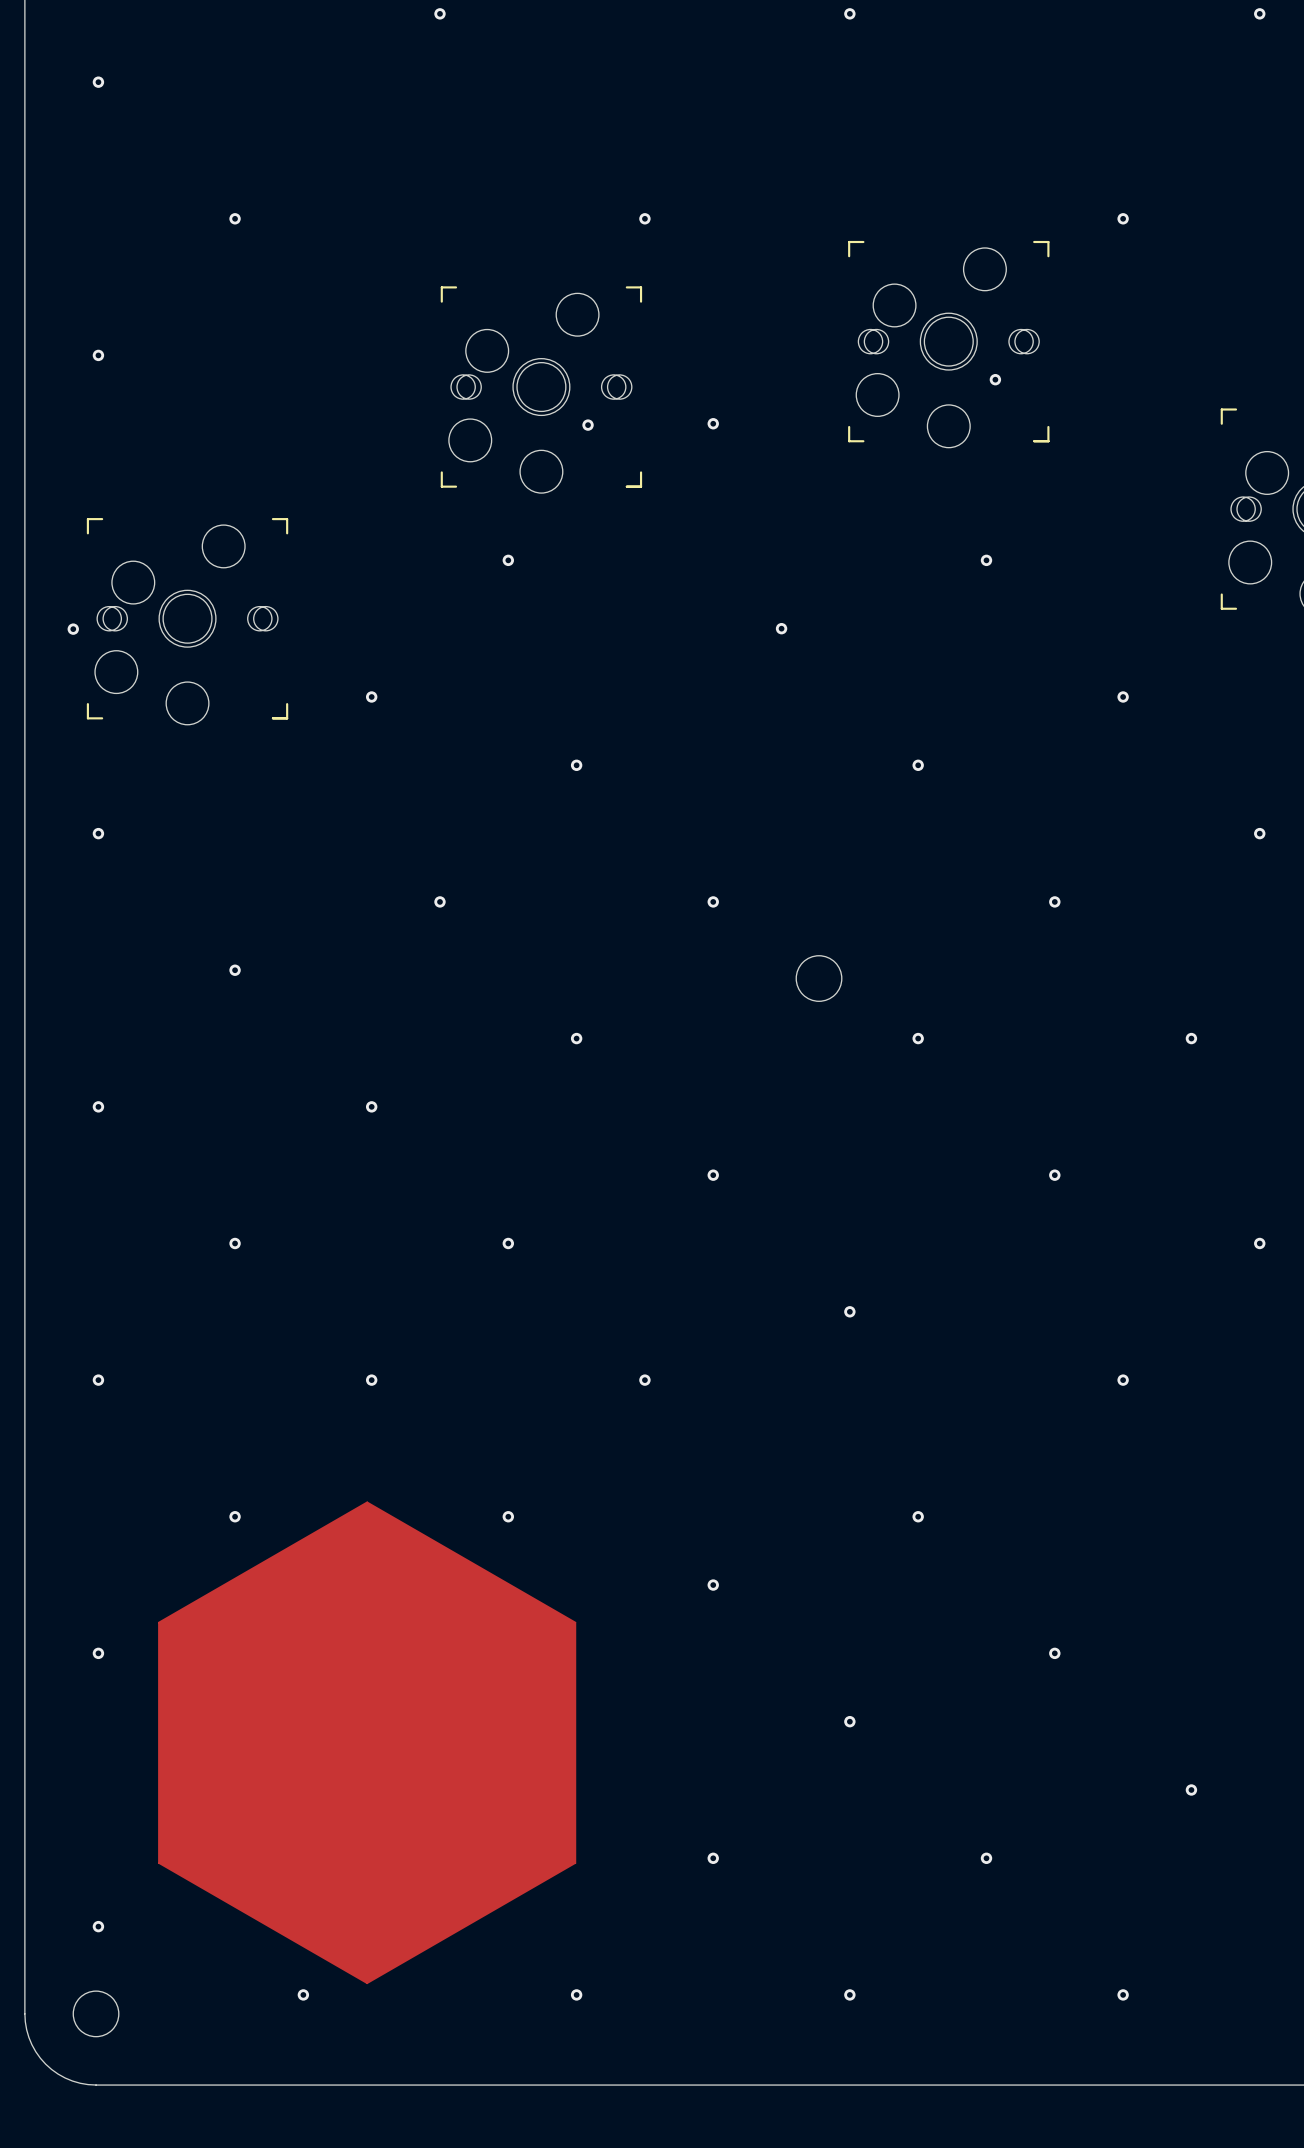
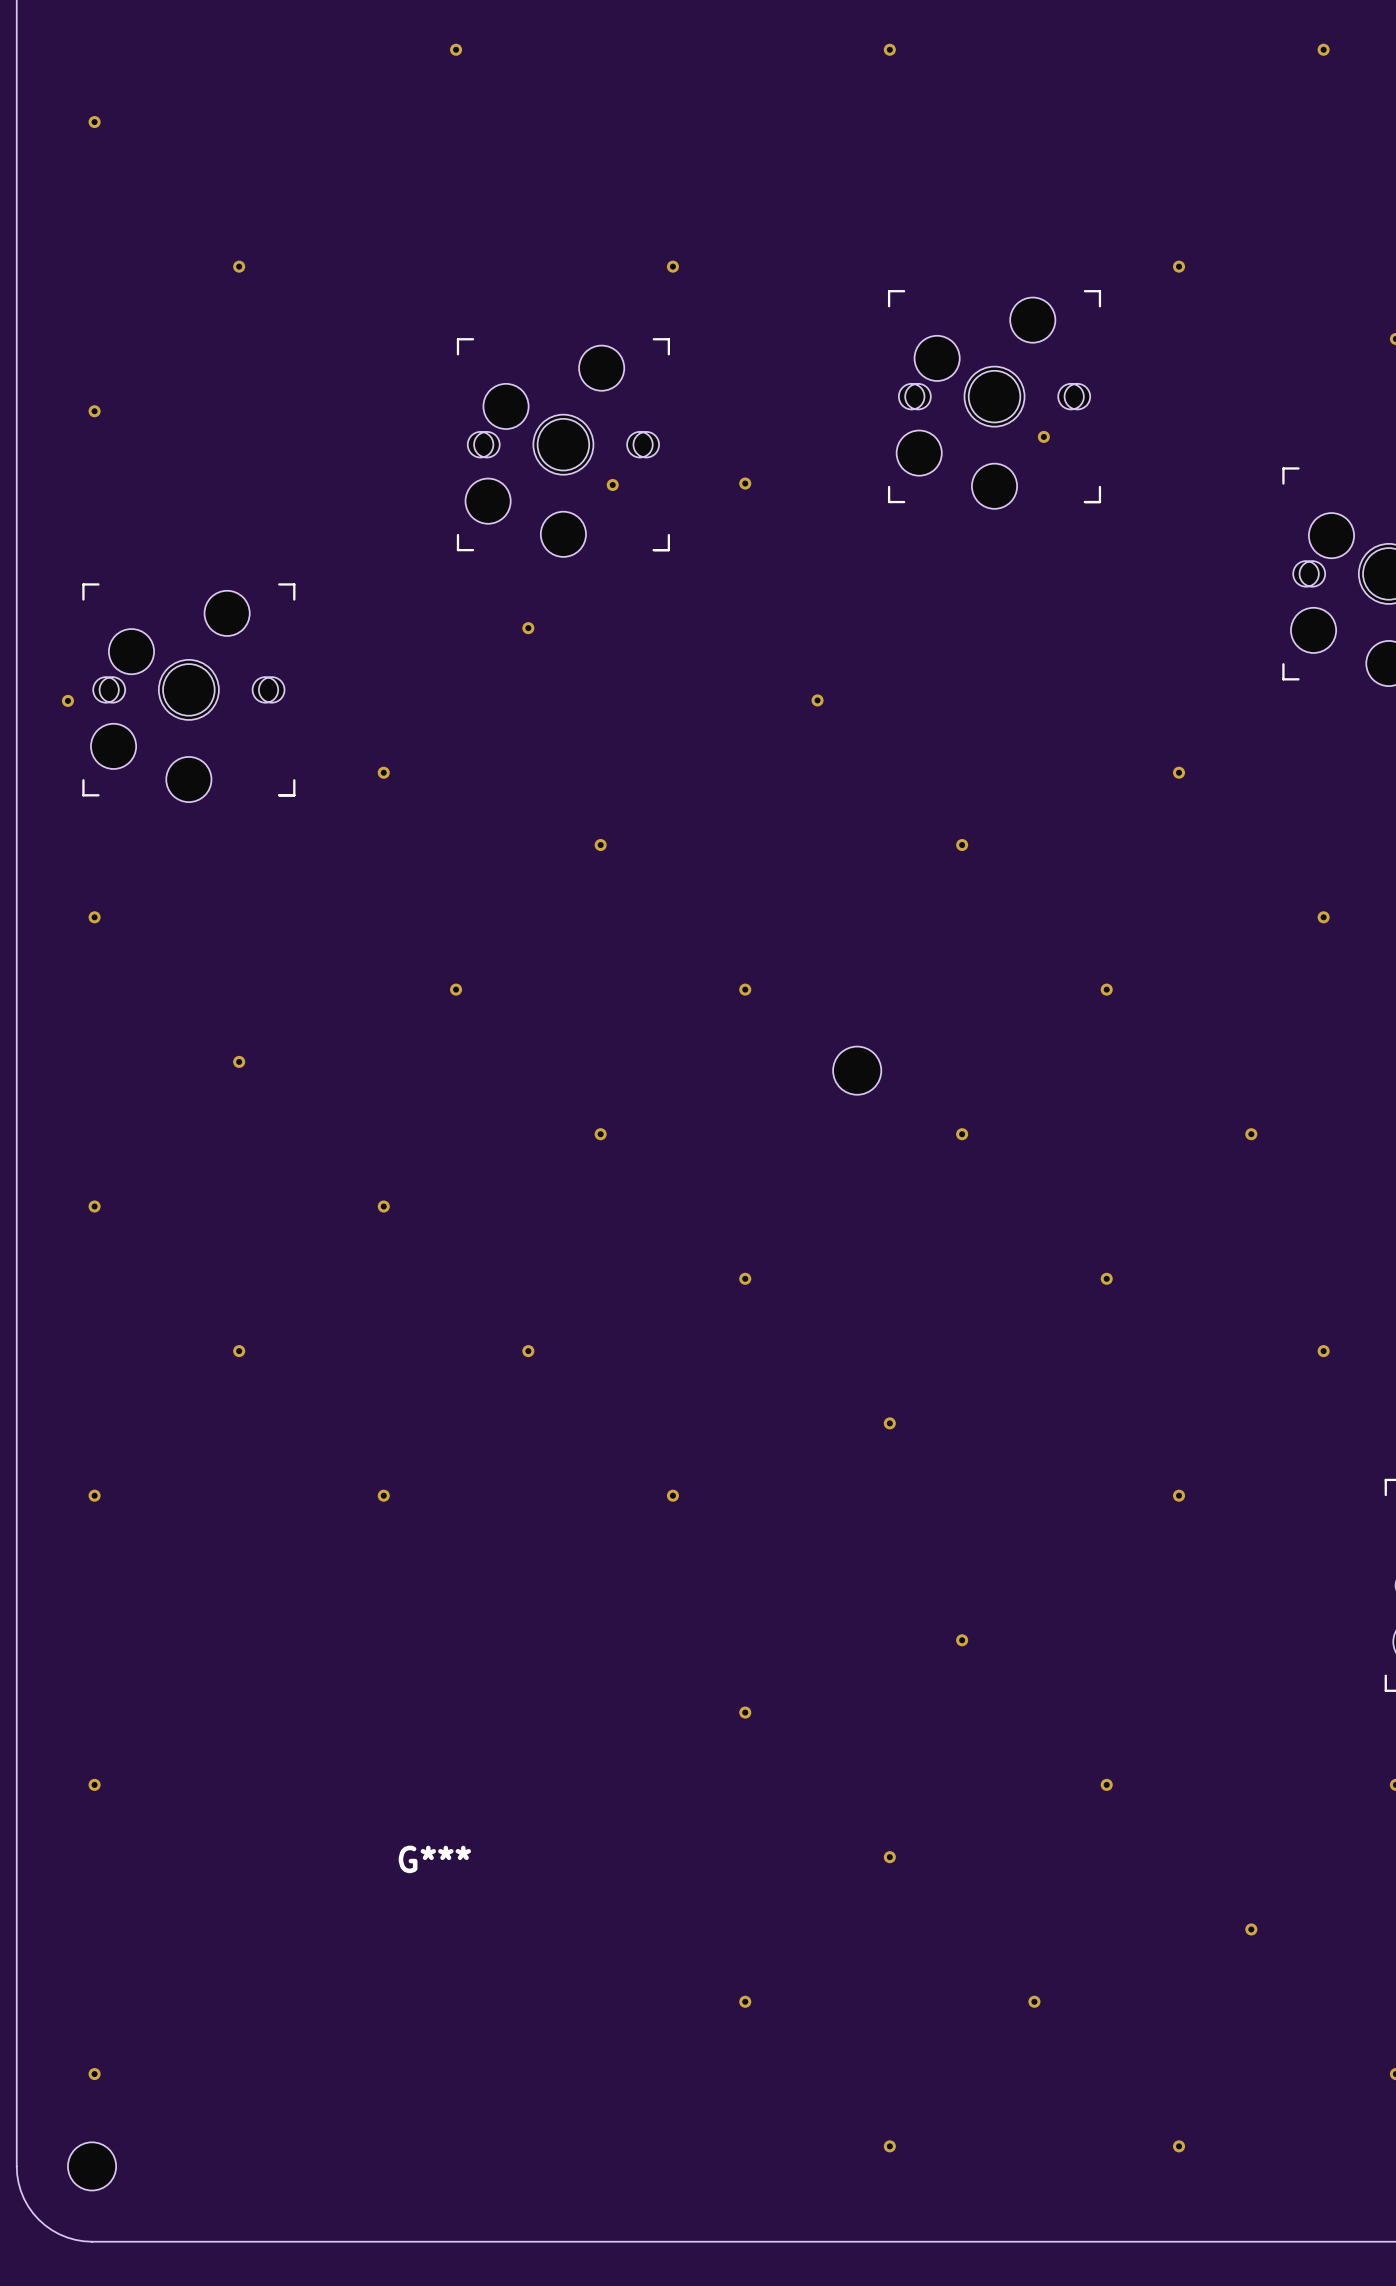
via: (986, 560) -> none
via: (235, 1516) -> none
via: (508, 1516) -> none
G***: none -> (434, 1859)
part: (367, 1742) -> none
via: (303, 1994) -> none
via: (576, 1994) -> none

